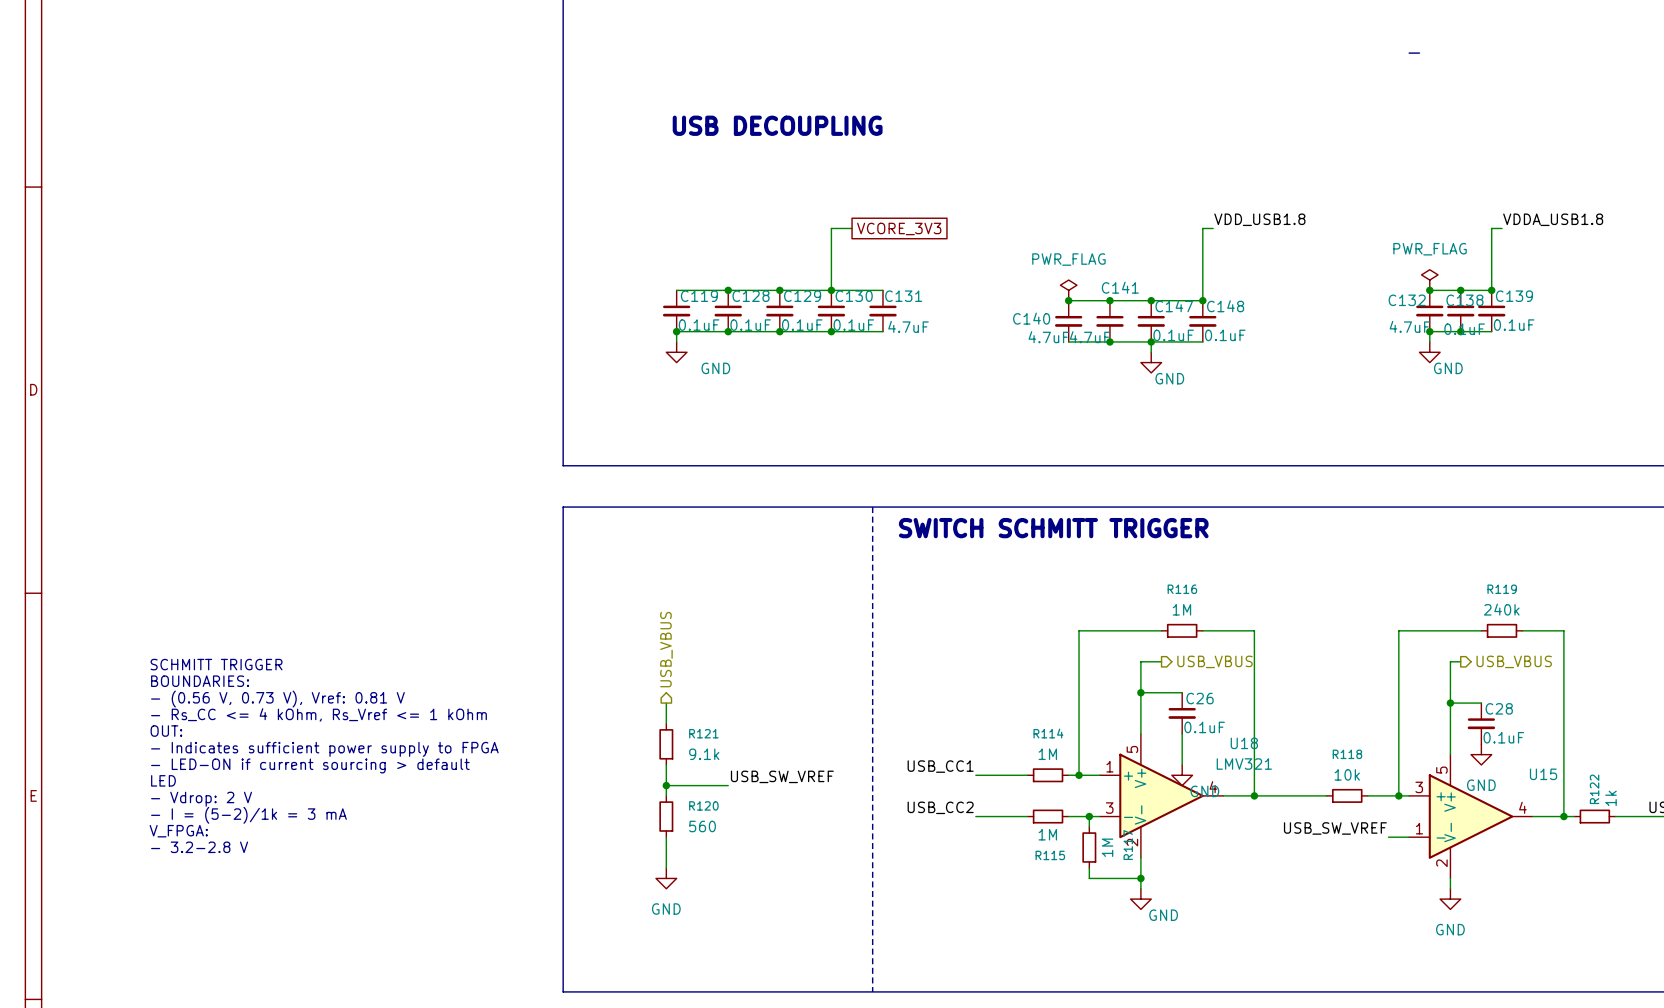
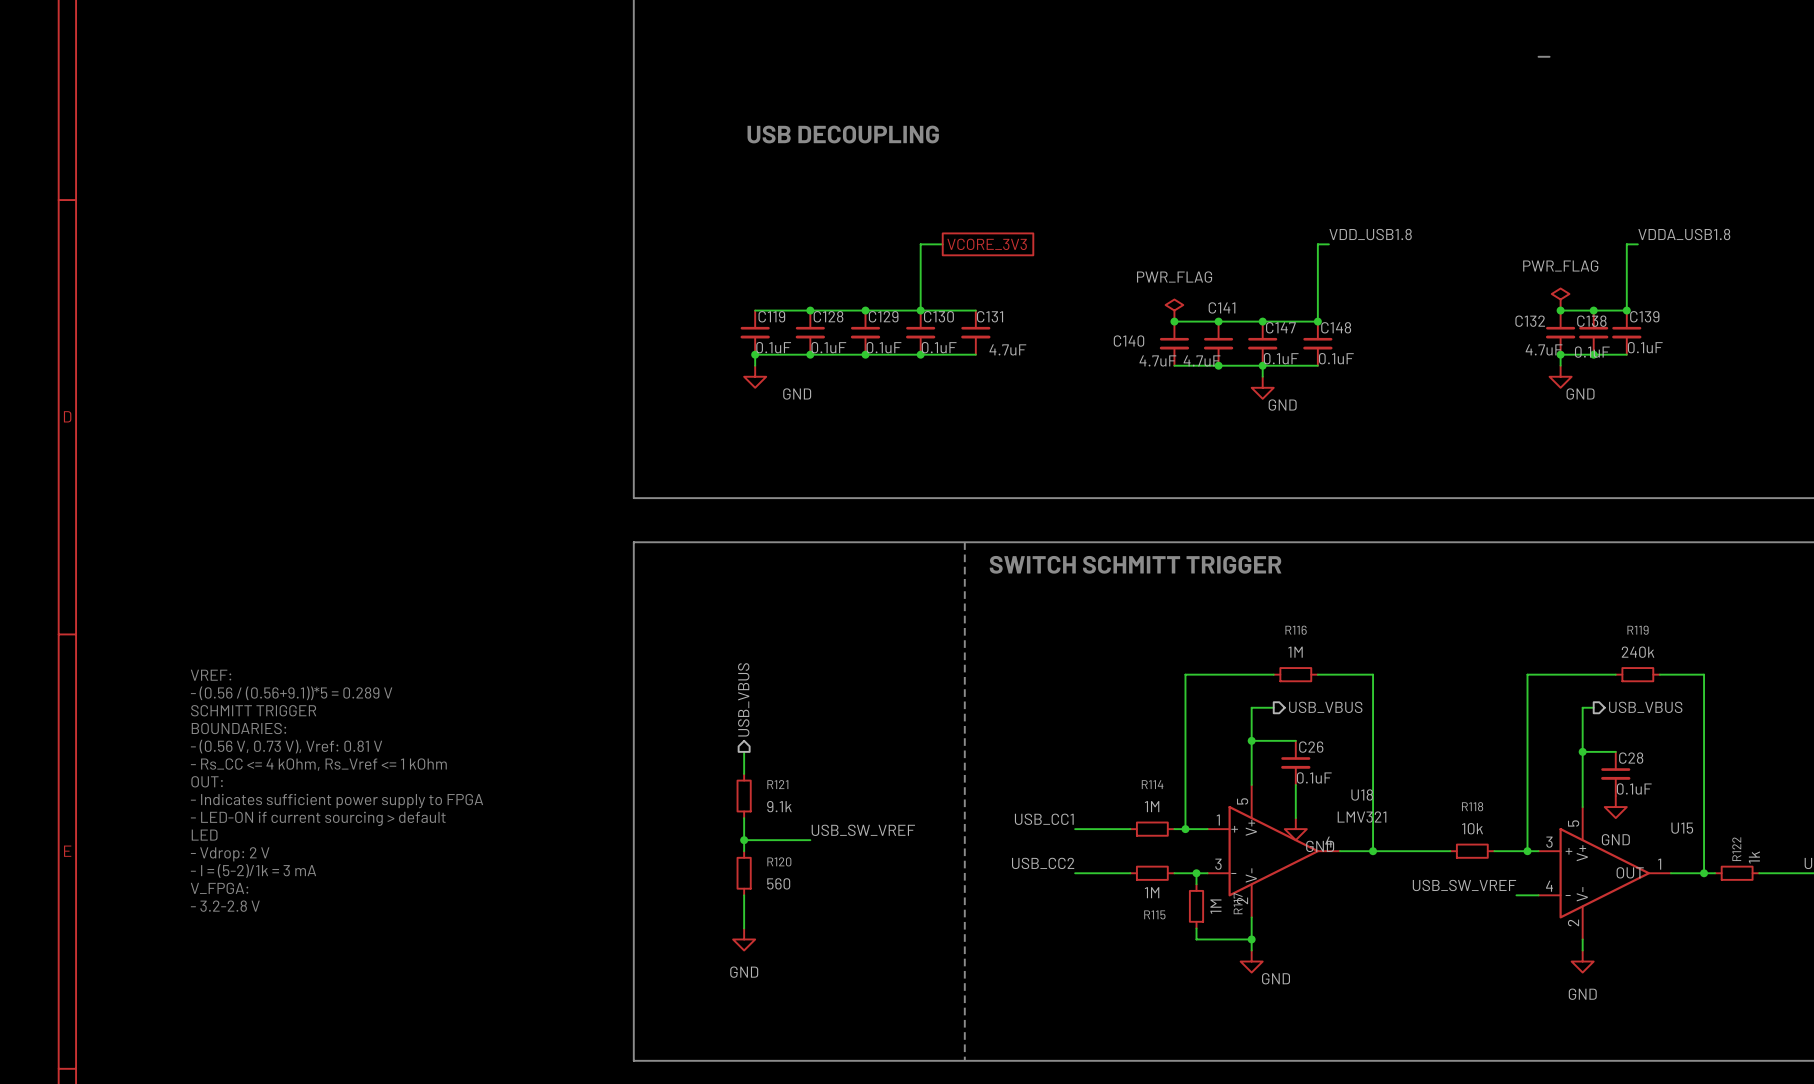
text: none -> VREF: (211, 675)
text: none -> - (0.56 / (0.56+9.1))*5 = 0.289 V (291, 693)
U15 pin number: 4 (1522, 807) -> 1 (1659, 864)
U15 pin name: none -> OUT (1630, 872)
U15 pin number: 1 (1419, 828) -> 4 (1549, 886)

